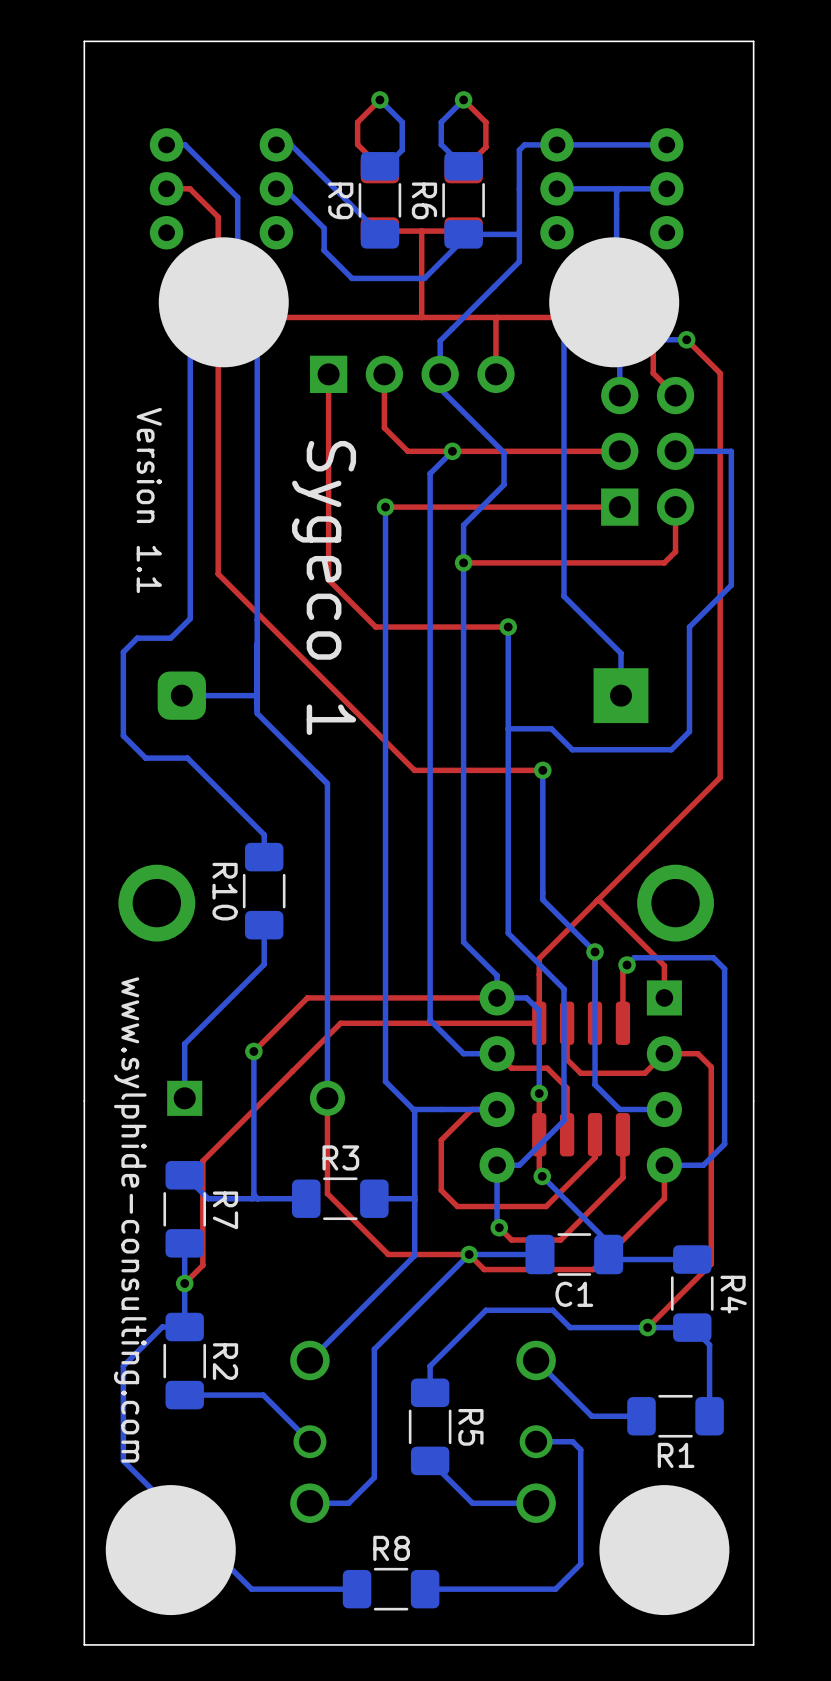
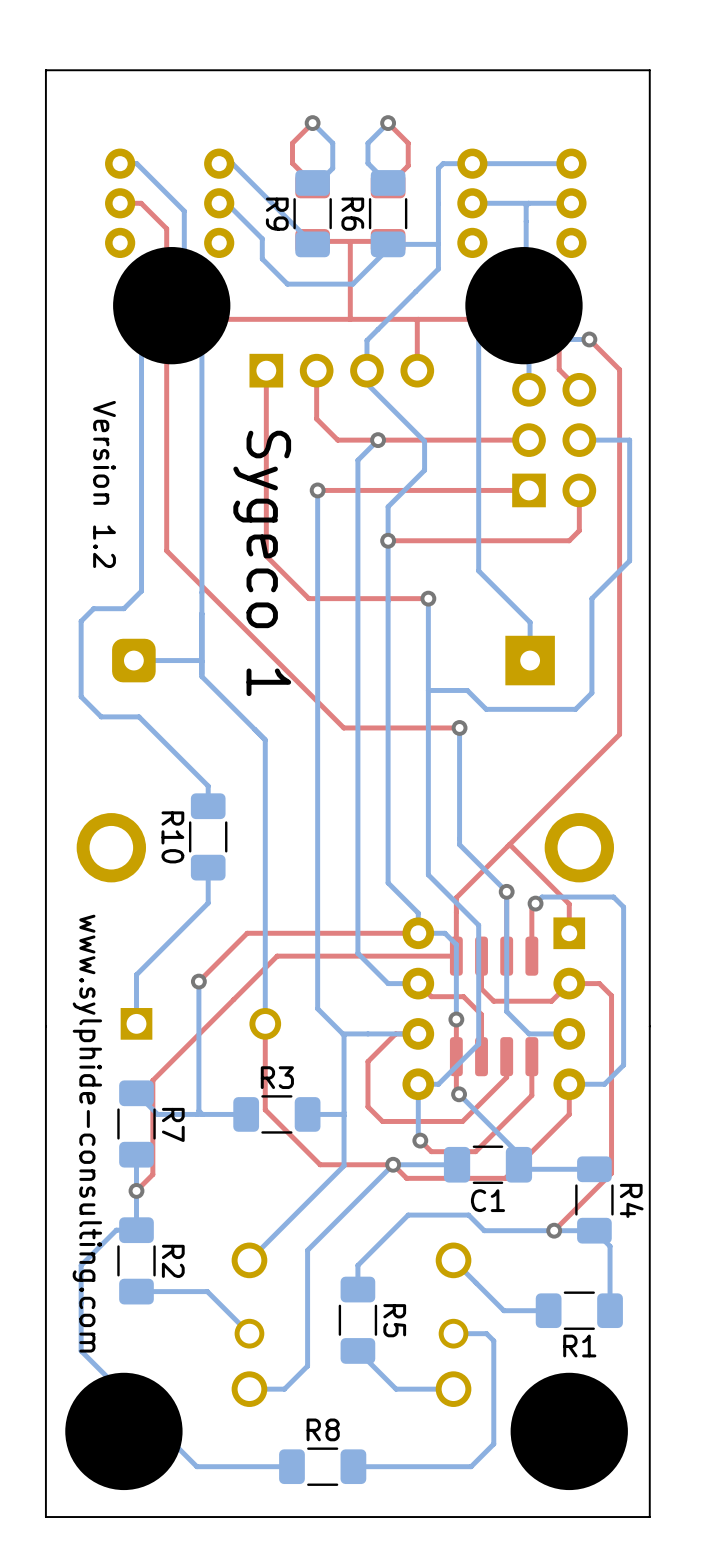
text: Version 1.1 (149, 500) -> Version 1.2 (104, 484)

